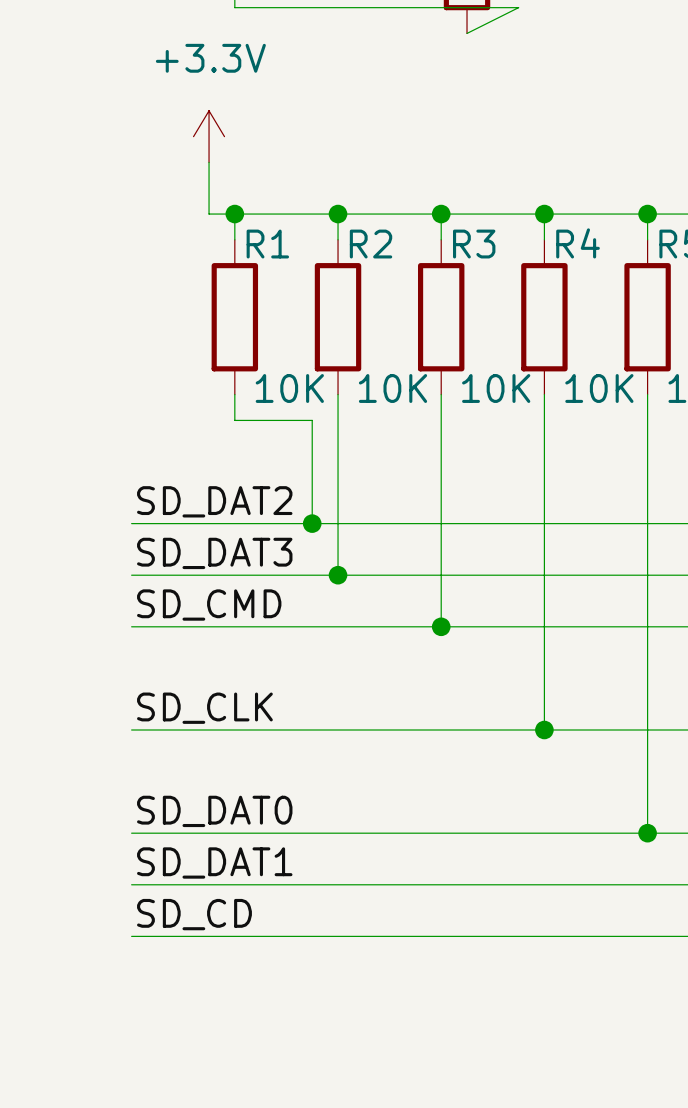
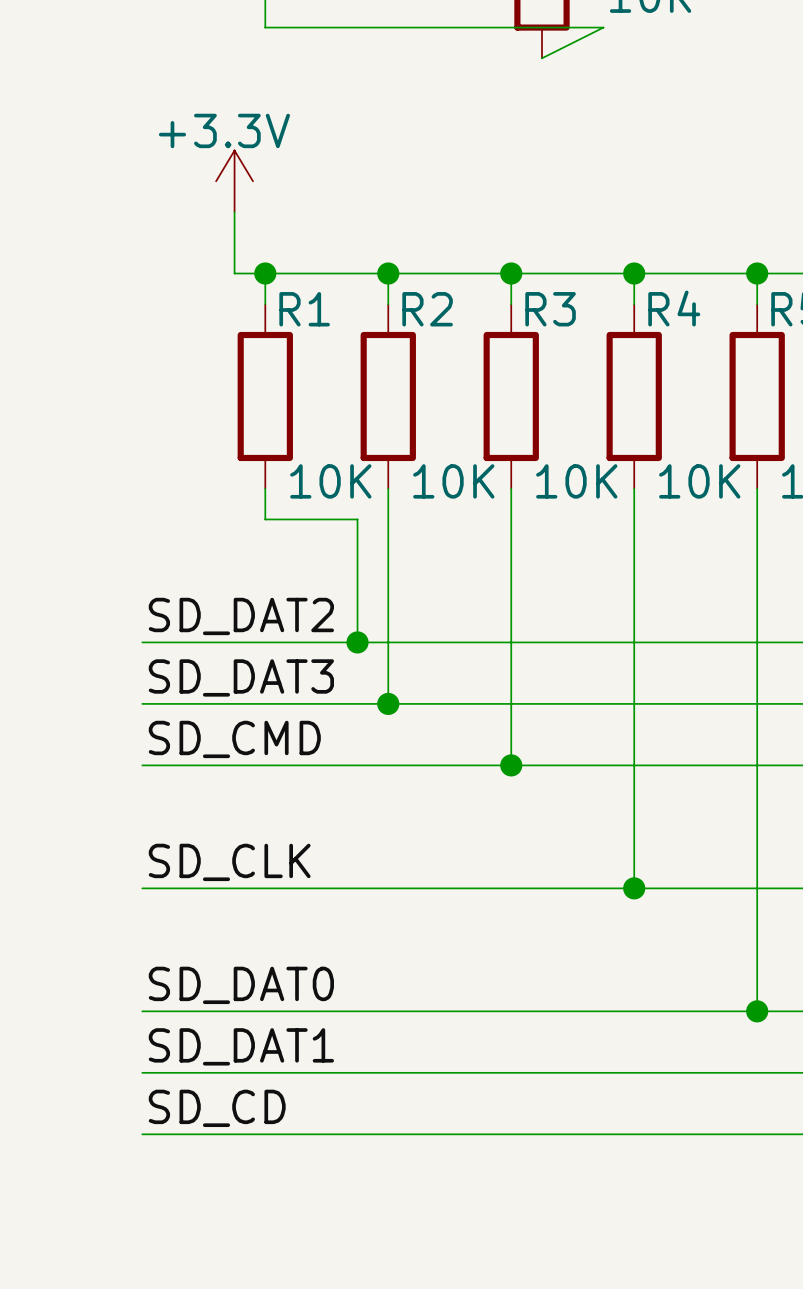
power symbol text position: +3.3V (210, 58) -> +3.3V (224, 130)

